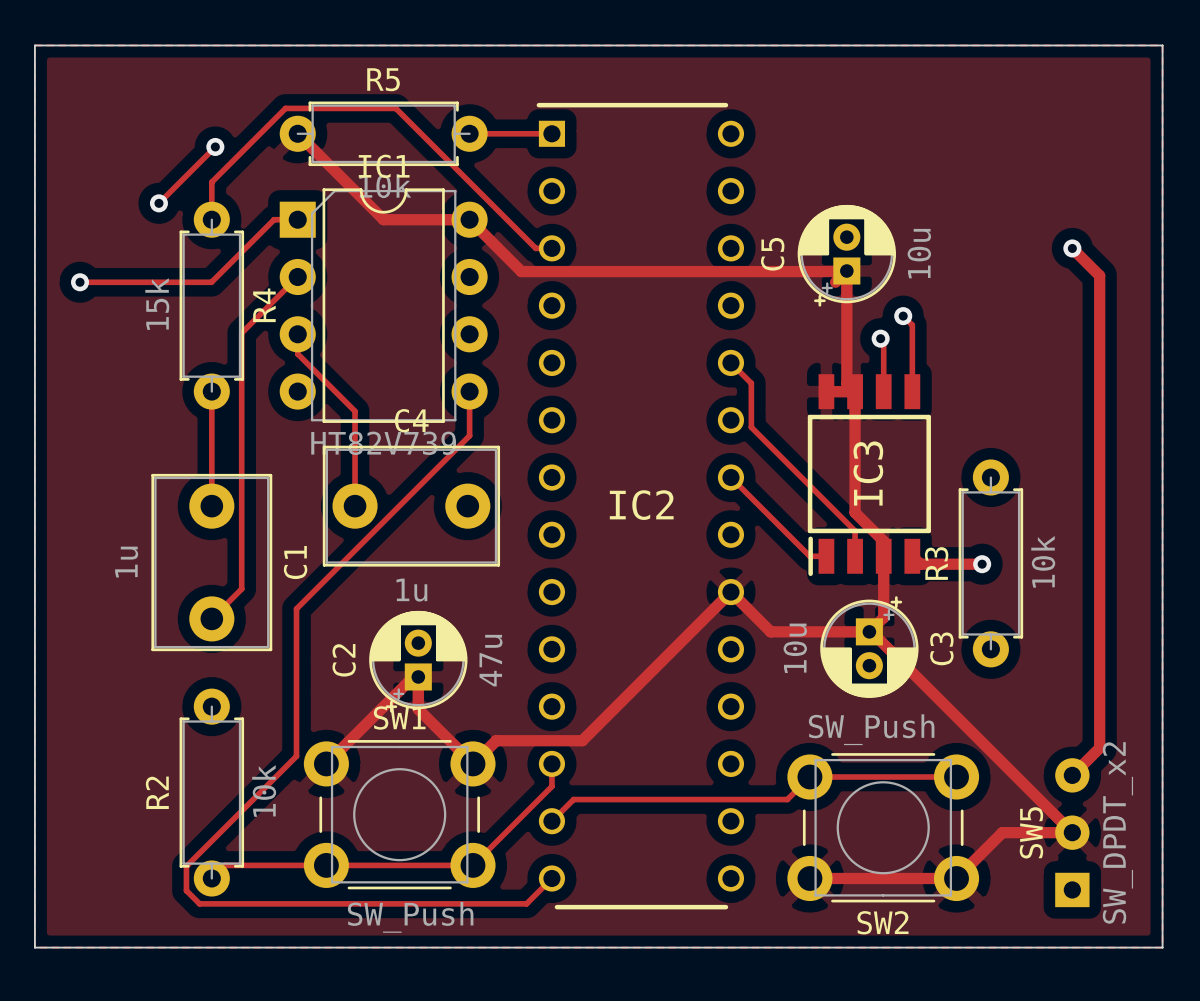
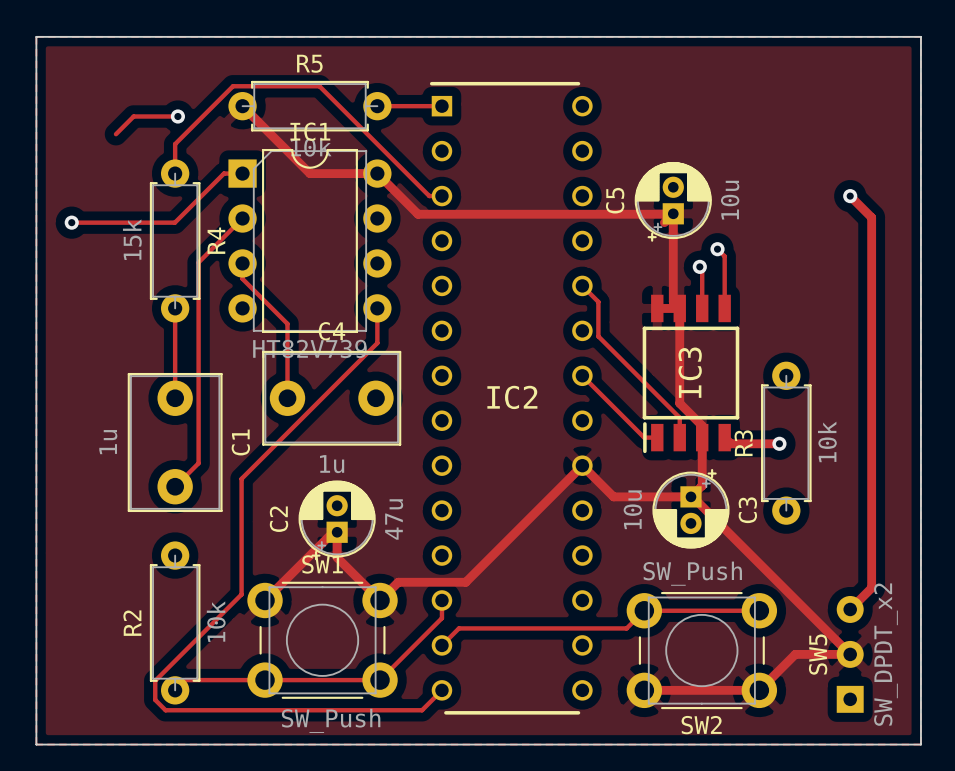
track: (215, 146) (158, 203) -> (177, 116) (133, 116) (115, 134)
via: (158, 203) -> none

